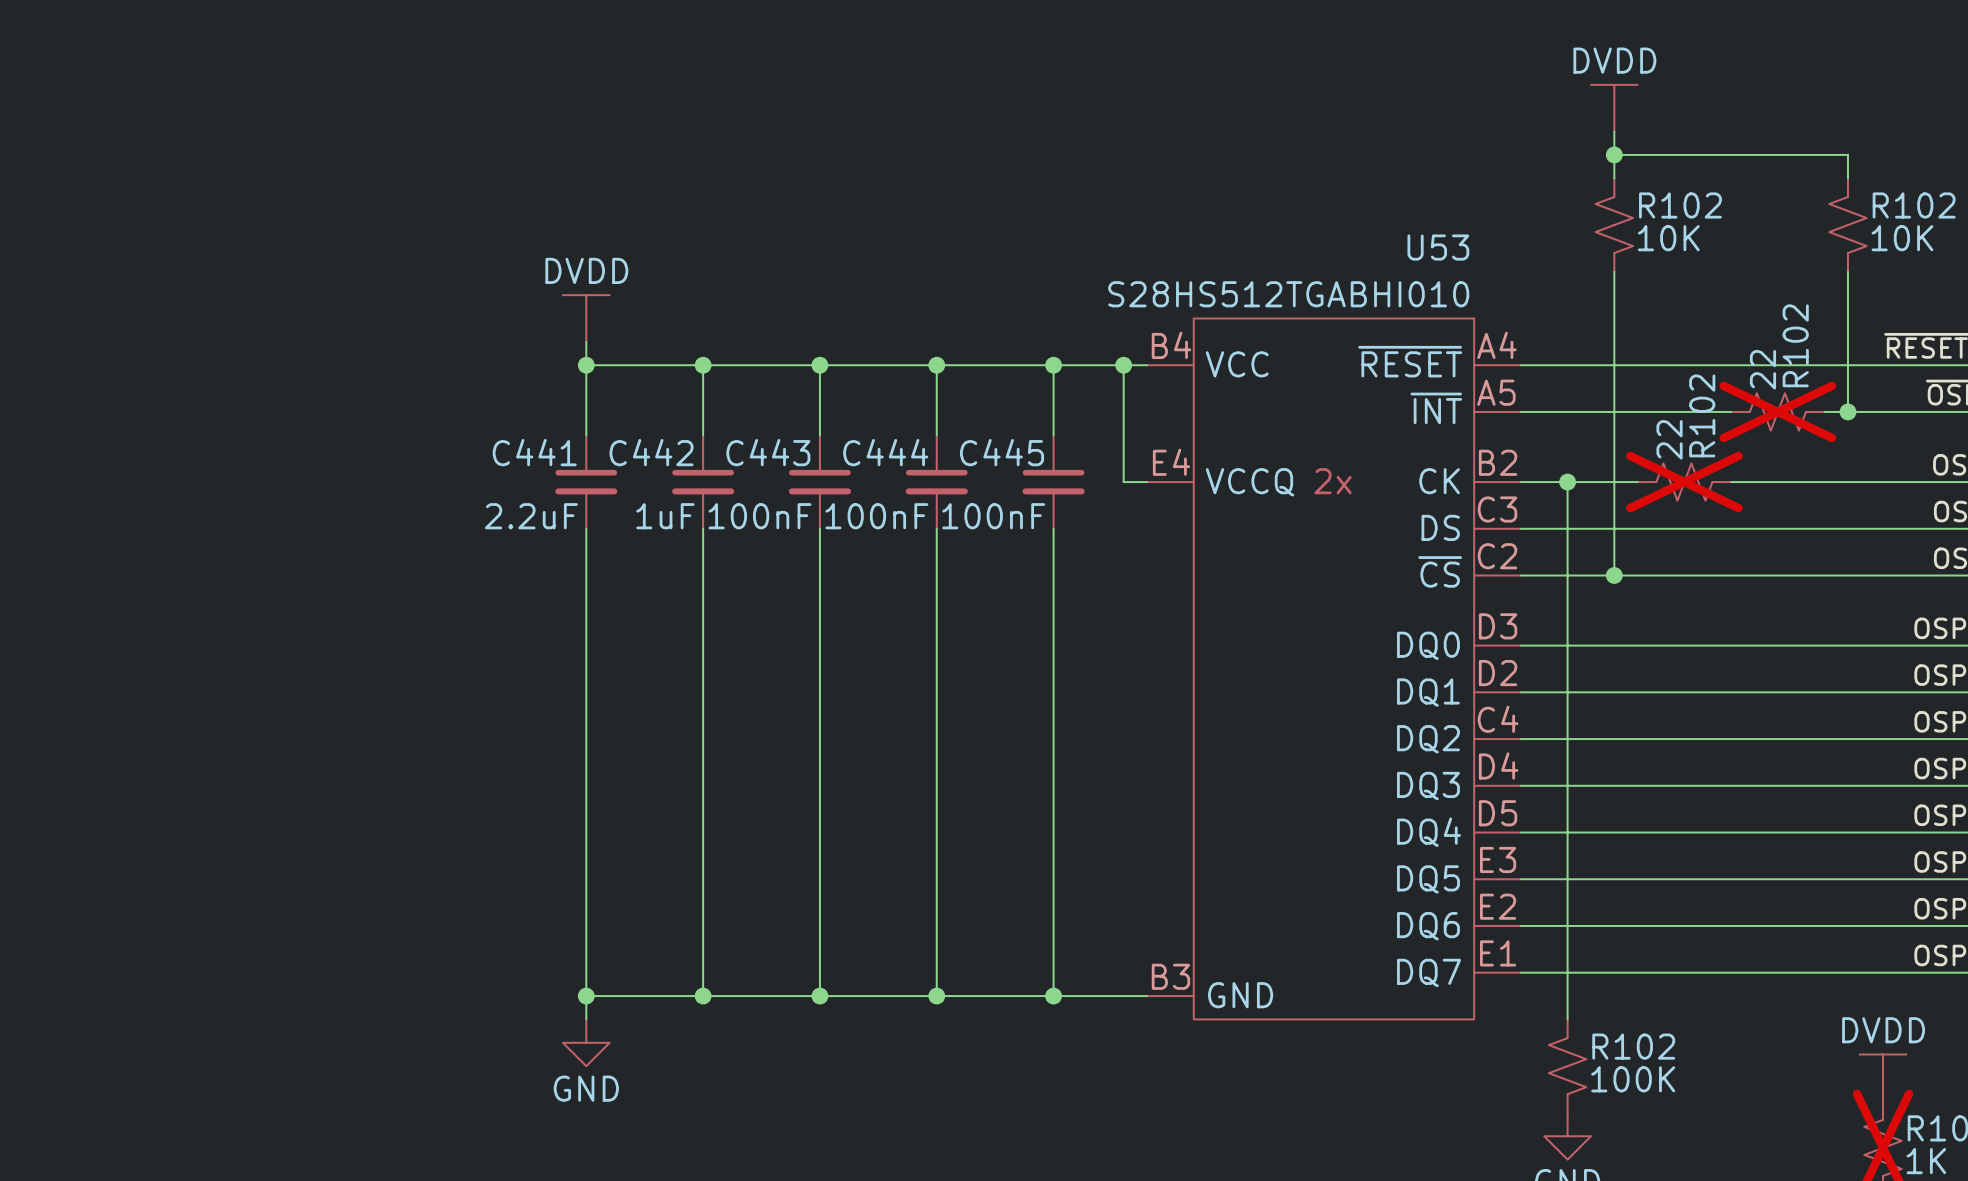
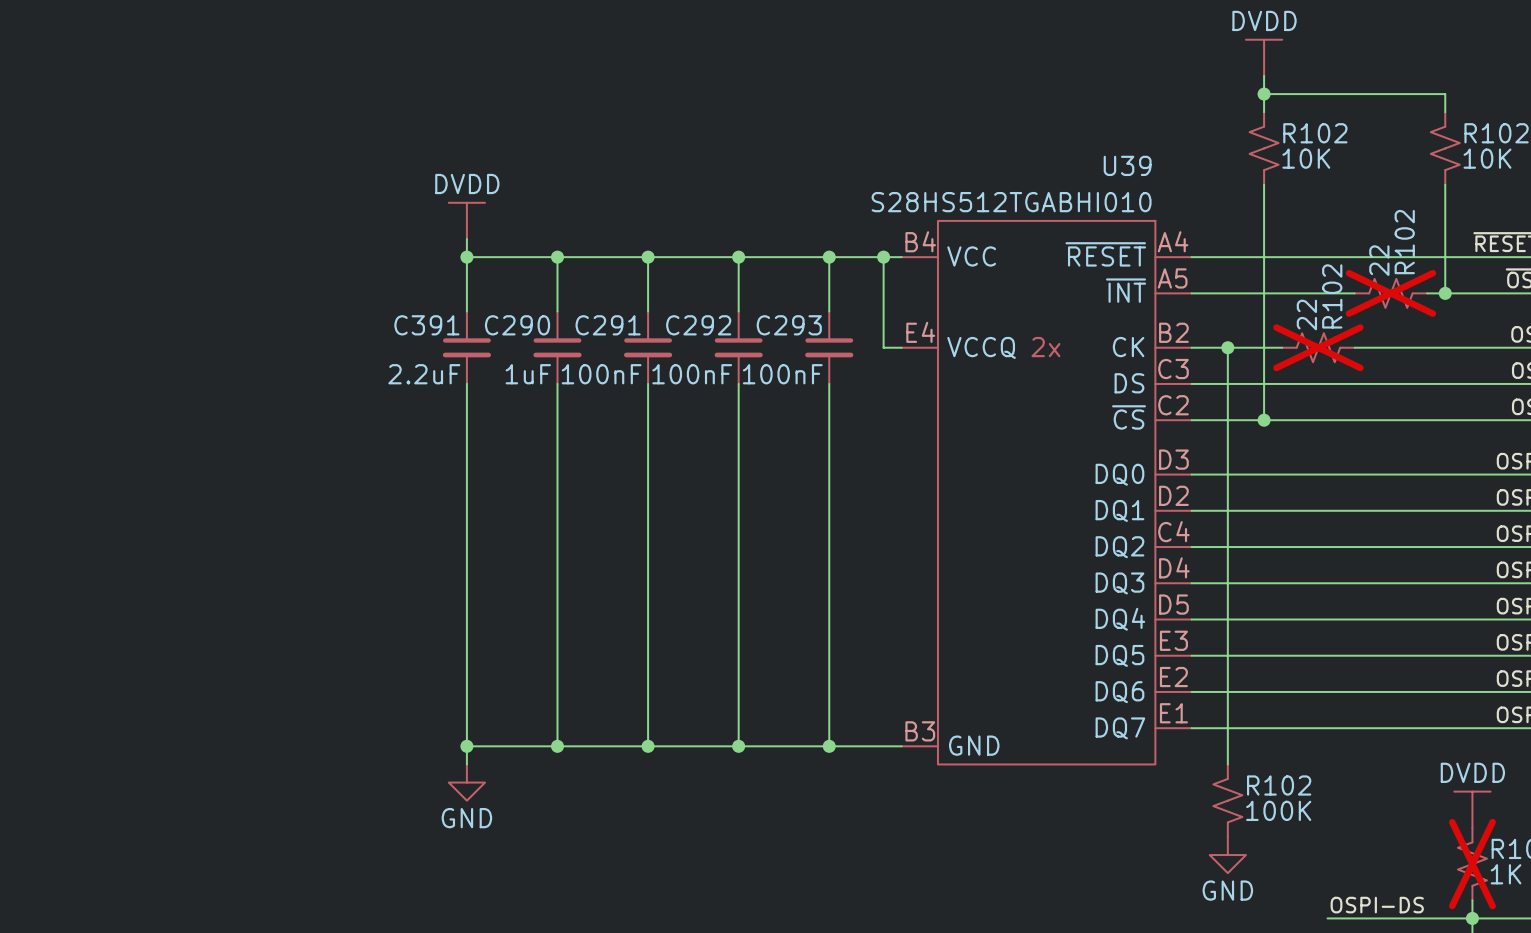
U53 name: U53 (1438, 247) -> U39 (1127, 165)
C441 name: C441 (534, 452) -> C391 (426, 325)
C442 name: C442 (651, 452) -> C290 (517, 325)
C443 name: C443 (768, 452) -> C291 (608, 325)
C444 name: C444 (885, 452) -> C292 (698, 325)
C445 name: C445 (1002, 452) -> C293 (789, 325)

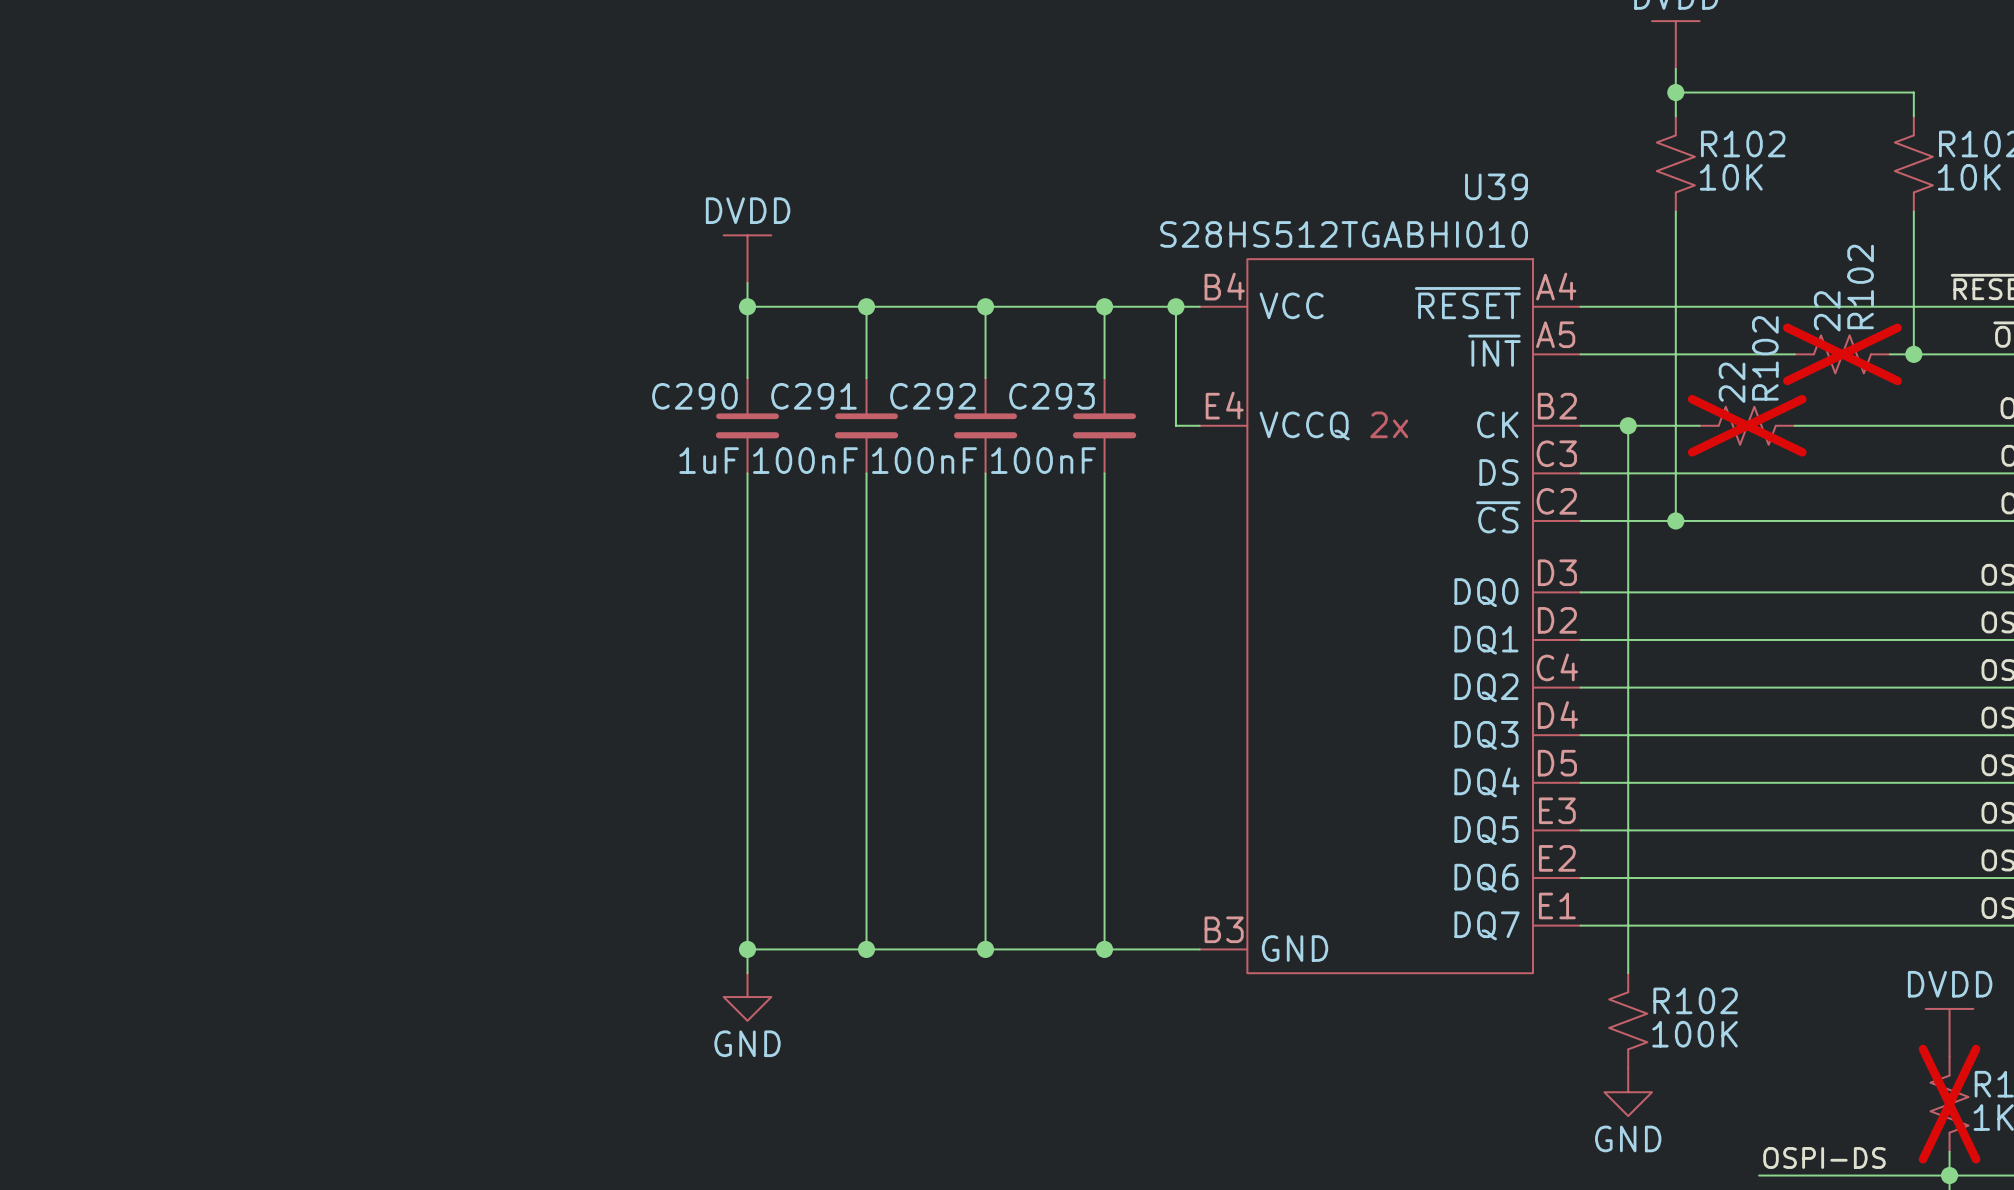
power symbol position: DVDD (466, 220) -> DVDD (747, 259)
wire: (466, 239) (466, 311) -> none
wire: (466, 257) (557, 257) -> (747, 282) (747, 306)
junction: (466, 257) -> none
C391: 2.2uF (466, 347) -> none
wire: (466, 383) (466, 764) -> none
wire: (466, 746) (557, 746) -> (747, 973) (747, 949)
junction: (466, 746) -> none
power symbol position: GND (466, 782) -> GND (747, 997)

